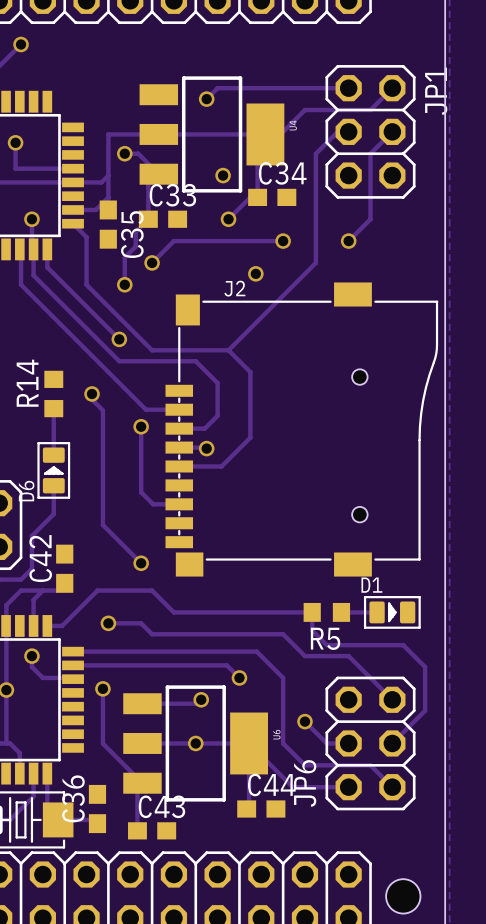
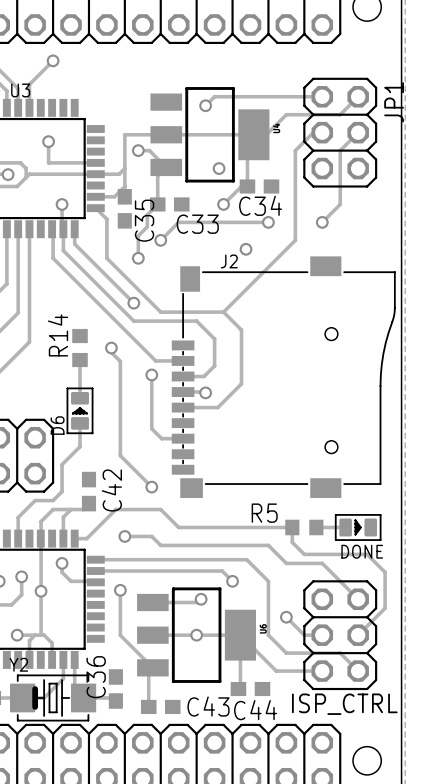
C34 name position: C34 (282, 173) -> C34 (260, 205)
C33 name position: C33 (172, 195) -> C33 (197, 224)
C42 name position: C42 (40, 558) -> C42 (111, 490)
D1 name: D1 (371, 585) -> DONE (362, 551)
R5 name position: R5 (325, 638) -> R5 (264, 513)
JP6 name: JP6 (305, 783) -> ISP_CTRL (344, 704)
C44 name position: C44 (271, 784) -> C44 (255, 710)
C43 name position: C43 (161, 806) -> C43 (208, 706)

